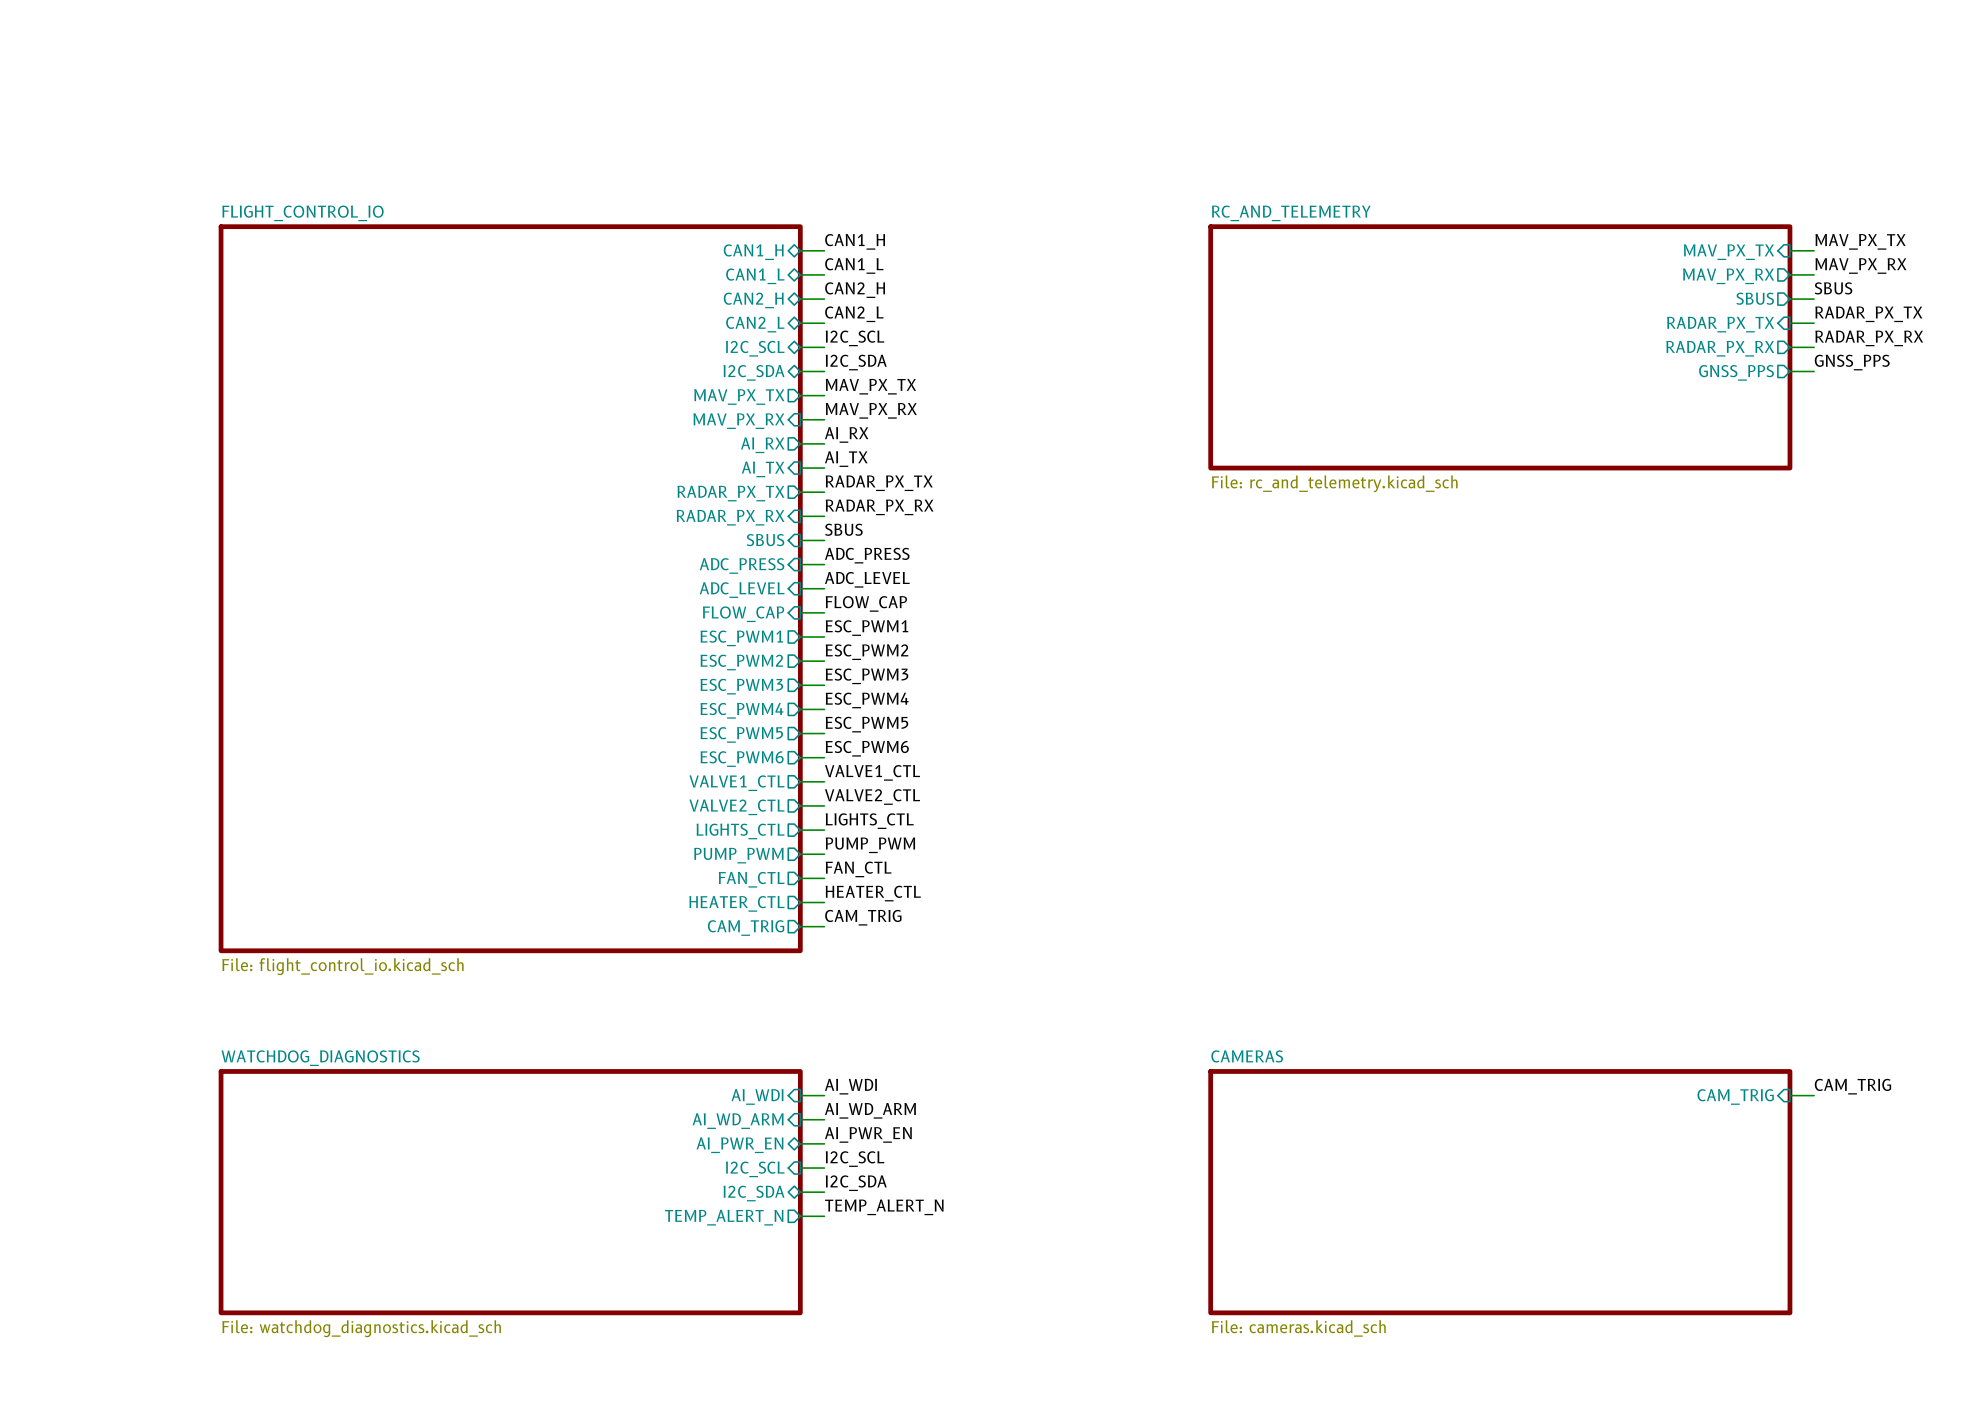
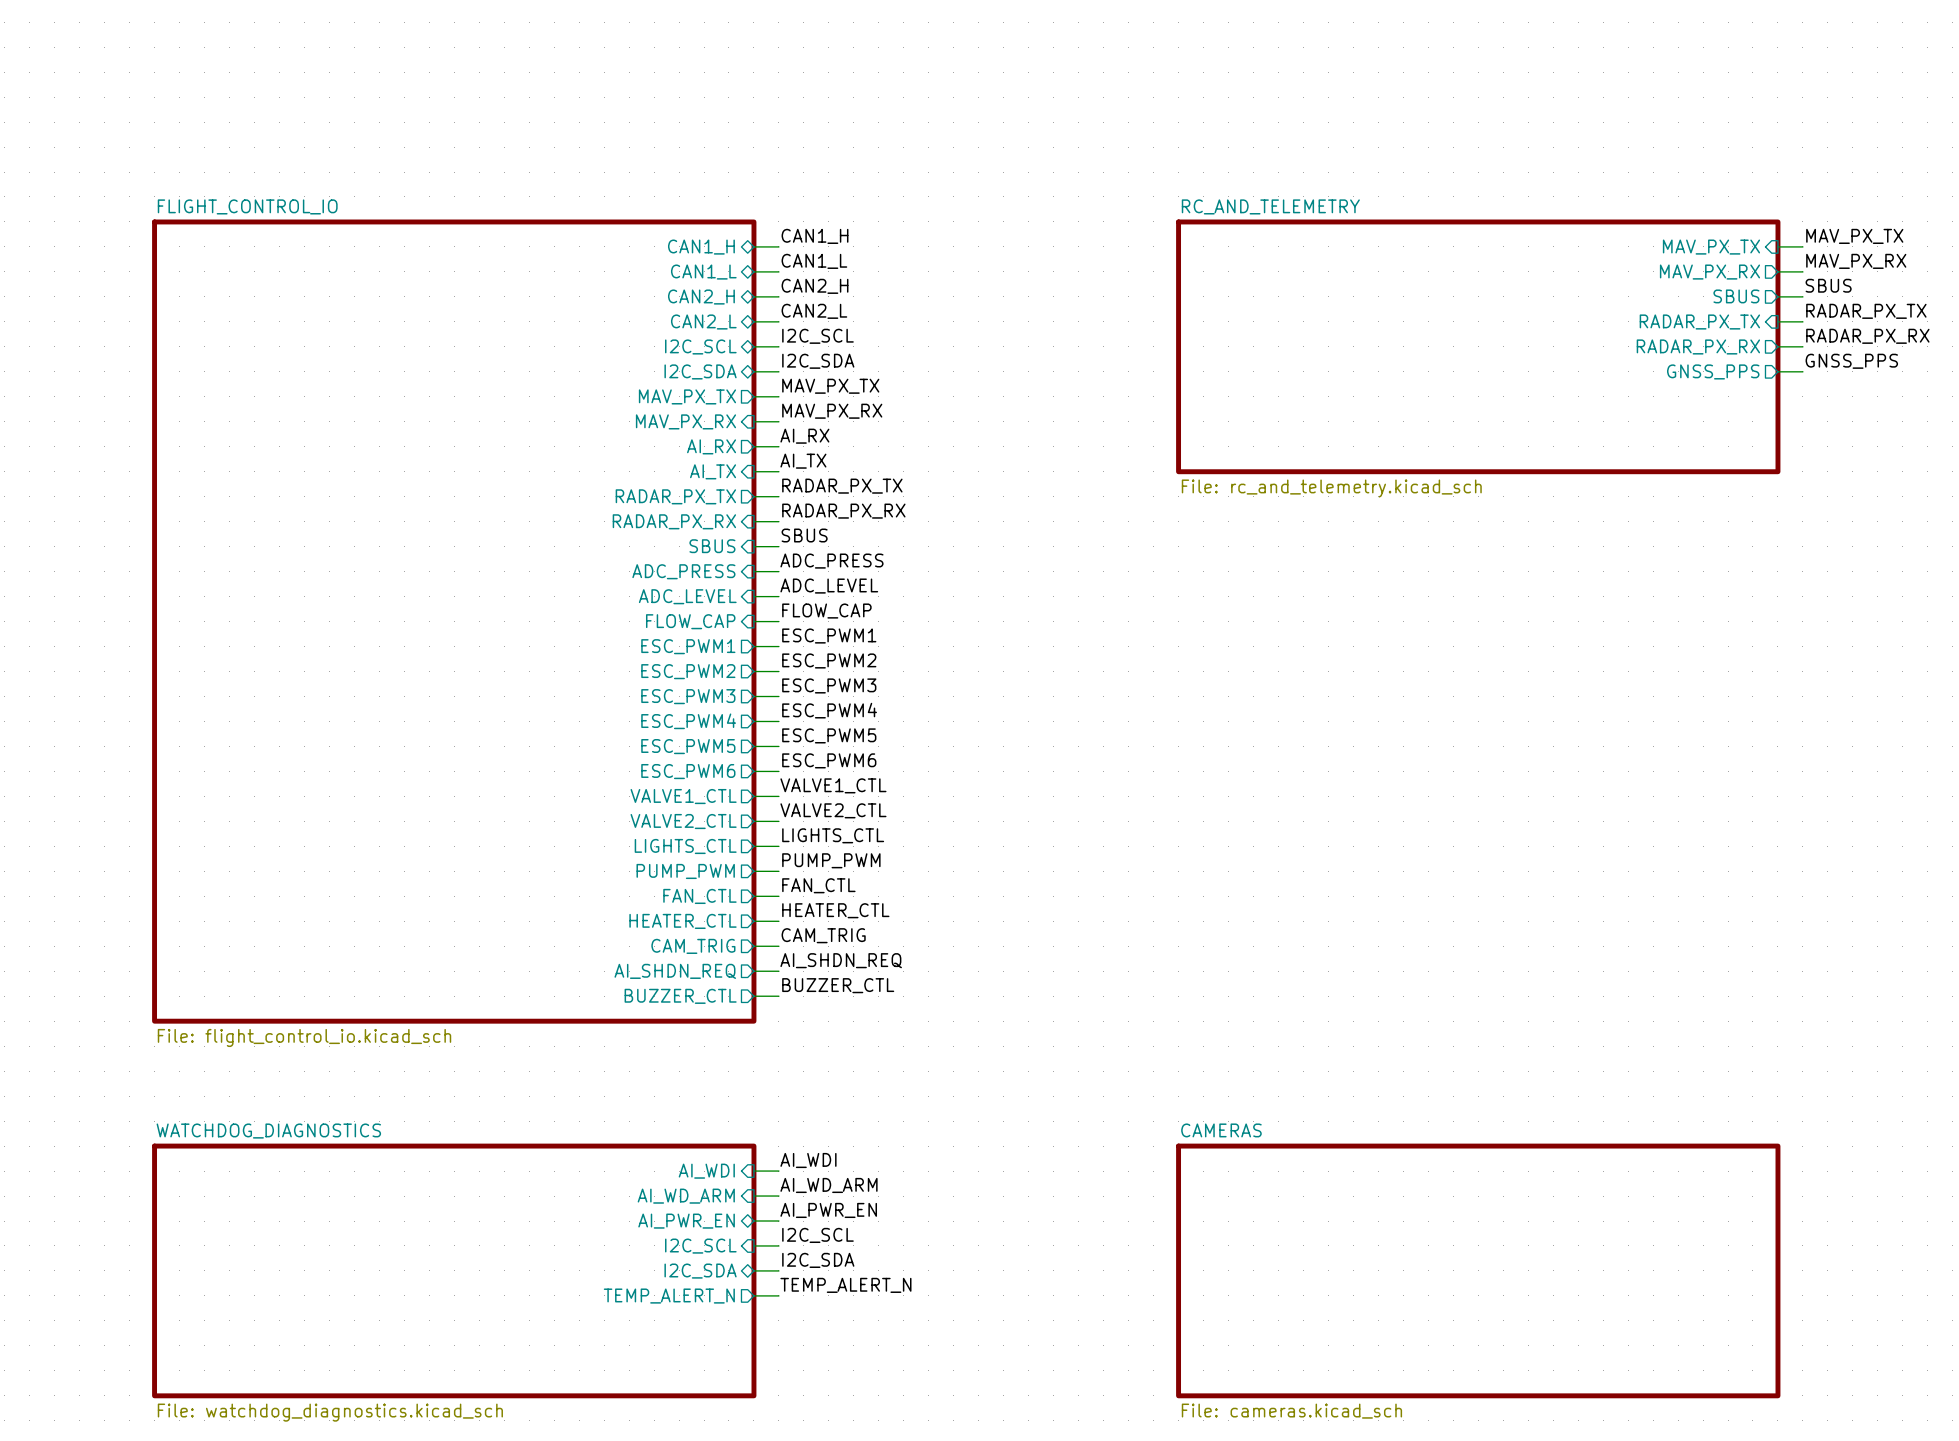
sheet FLIGHT_CONTROL_IO: File: flight_control_io.kicad_sch (510, 588) -> none
sheet FLIGHT_CONTROL_IO: none -> File: flight_control_io.kicad_sch (454, 621)
label: none -> AI_SHDN_REQ (841, 960)
sheet pin: none -> AI_SHDN_REQ (675, 971)
label: none -> BUZZER_CTL (838, 985)
sheet pin: none -> BUZZER_CTL (680, 996)
label: AI_WDI (850, 1086) -> none
label: CAM_TRIG (1852, 1086) -> none
wire: (800, 1095) (824, 1095) -> (753, 971) (778, 971)
wire: (1789, 1095) (1814, 1095) -> none
sheet pin: AI_WDI (757, 1096) -> none
sheet pin: CAM_TRIG (1735, 1096) -> none
label: AI_WD_ARM (870, 1110) -> none
wire: (800, 1119) (824, 1119) -> (753, 996) (778, 996)
sheet pin: AI_WD_ARM (738, 1121) -> none
label: AI_PWR_EN (868, 1134) -> AI_WDI (808, 1160)
sheet pin shape: bidirectional (739, 1145) -> input (706, 1171)
sheet pin: AI_PWR_EN (739, 1145) -> AI_WDI (706, 1171)
label: I2C_SCL (855, 1159) -> AI_WD_ARM (828, 1185)
sheet pin: I2C_SCL (755, 1169) -> AI_WD_ARM (686, 1196)
label: I2C_SDA (856, 1183) -> AI_PWR_EN (828, 1210)
sheet WATCHDOG_DIAGNOSTICS position: (510, 1192) -> (454, 1270)
sheet CAMERAS position: (1500, 1192) -> (1478, 1270)
sheet pin: I2C_SDA (754, 1193) -> AI_PWR_EN (686, 1221)
label: TEMP_ALERT_N (884, 1207) -> I2C_SCL (817, 1235)
sheet pin shape: output (724, 1217) -> input (700, 1246)
sheet pin: TEMP_ALERT_N (724, 1217) -> I2C_SCL (700, 1246)
label: none -> I2C_SDA (818, 1260)
wire: none -> (753, 1270) (778, 1270)
sheet pin: none -> I2C_SDA (700, 1271)
label: none -> TEMP_ALERT_N (845, 1285)
wire: none -> (753, 1295) (778, 1295)
sheet pin: none -> TEMP_ALERT_N (669, 1296)

